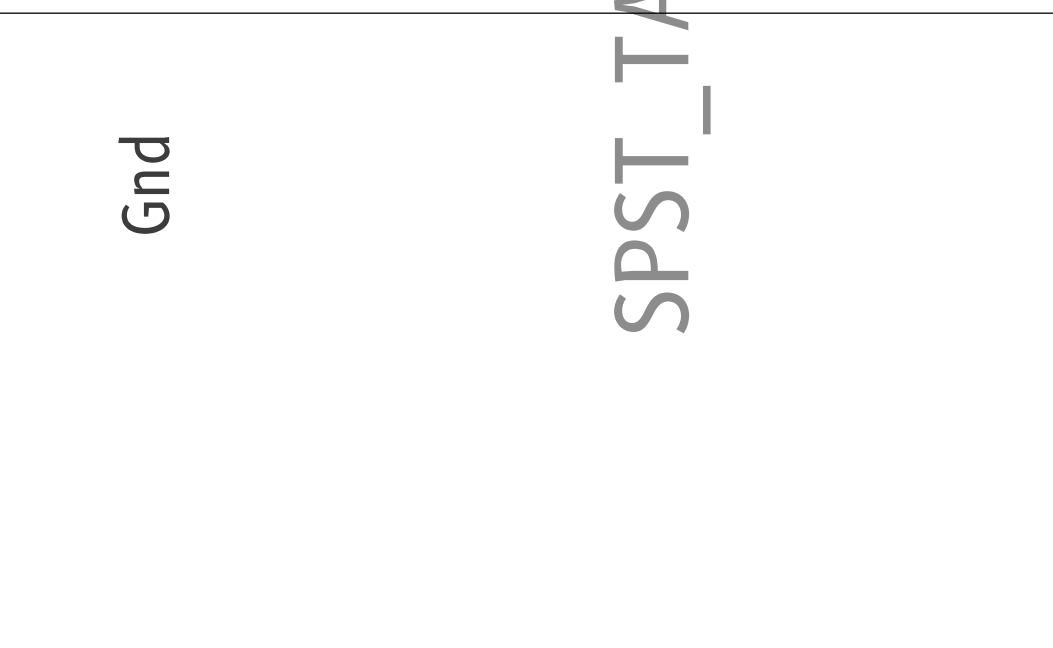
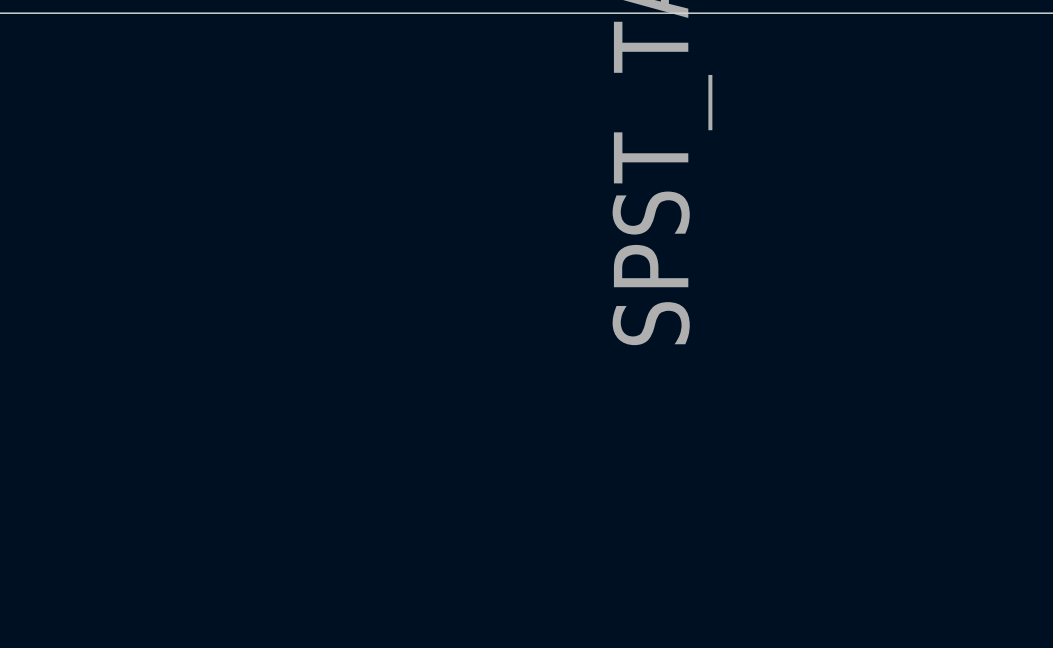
text: Gnd (144, 185) -> none

